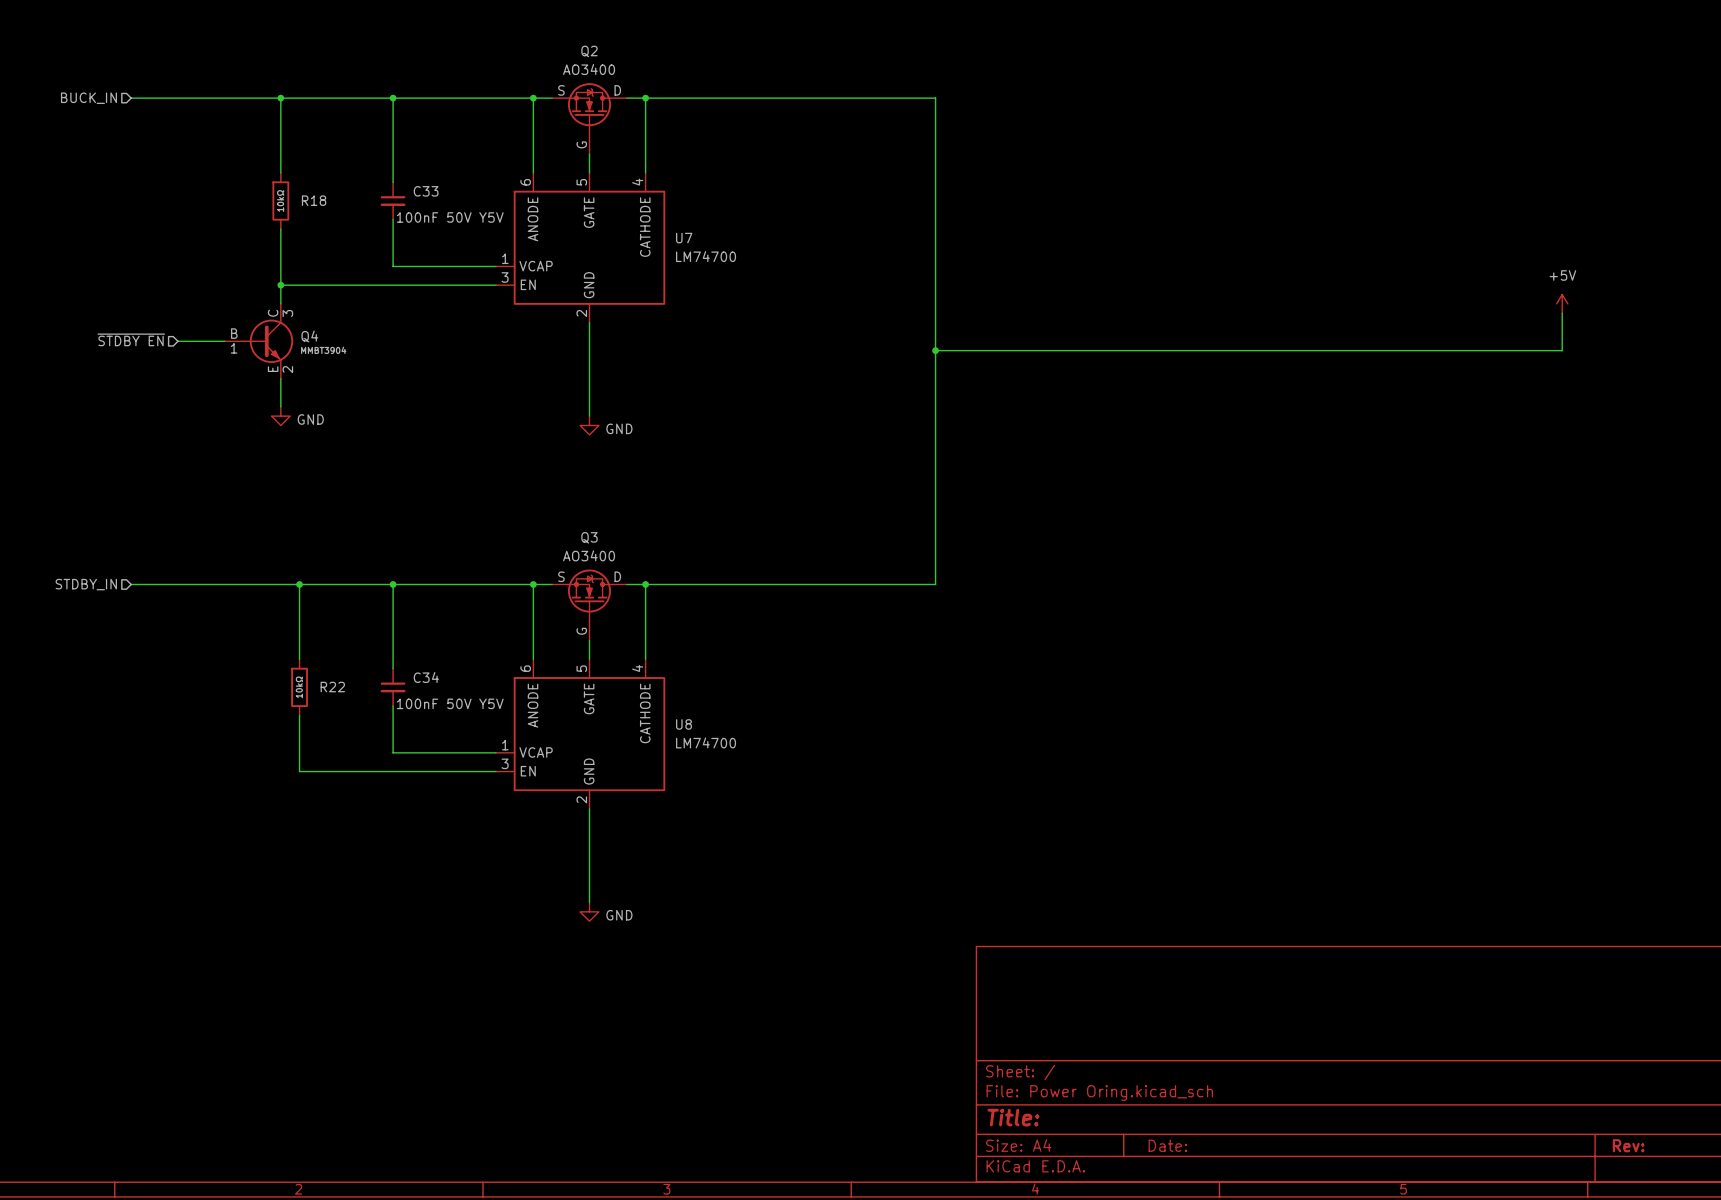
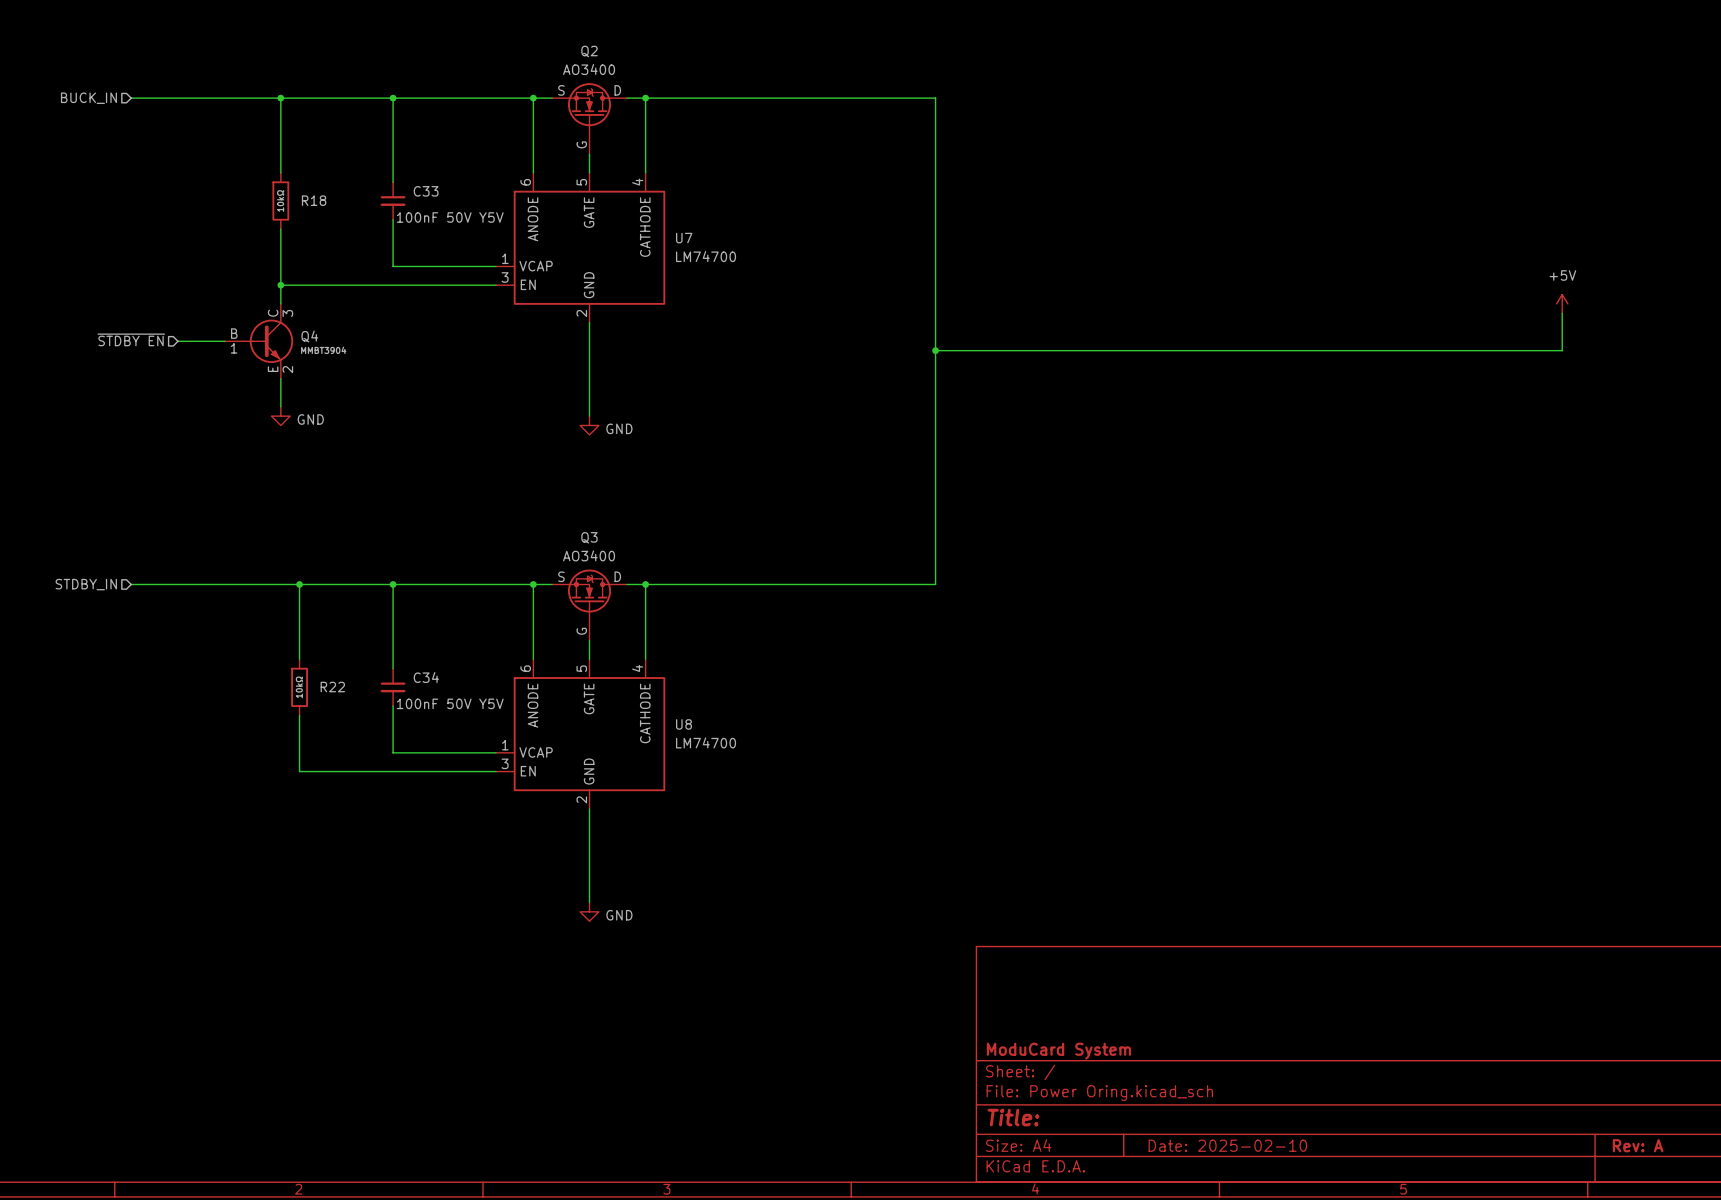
title block: none -> ModuCard System (1058, 1051)
title block: Date: (1167, 1145) -> Date: 2025-02-10 (1227, 1145)
title block: Rev: (1628, 1145) -> Rev: A (1638, 1145)

